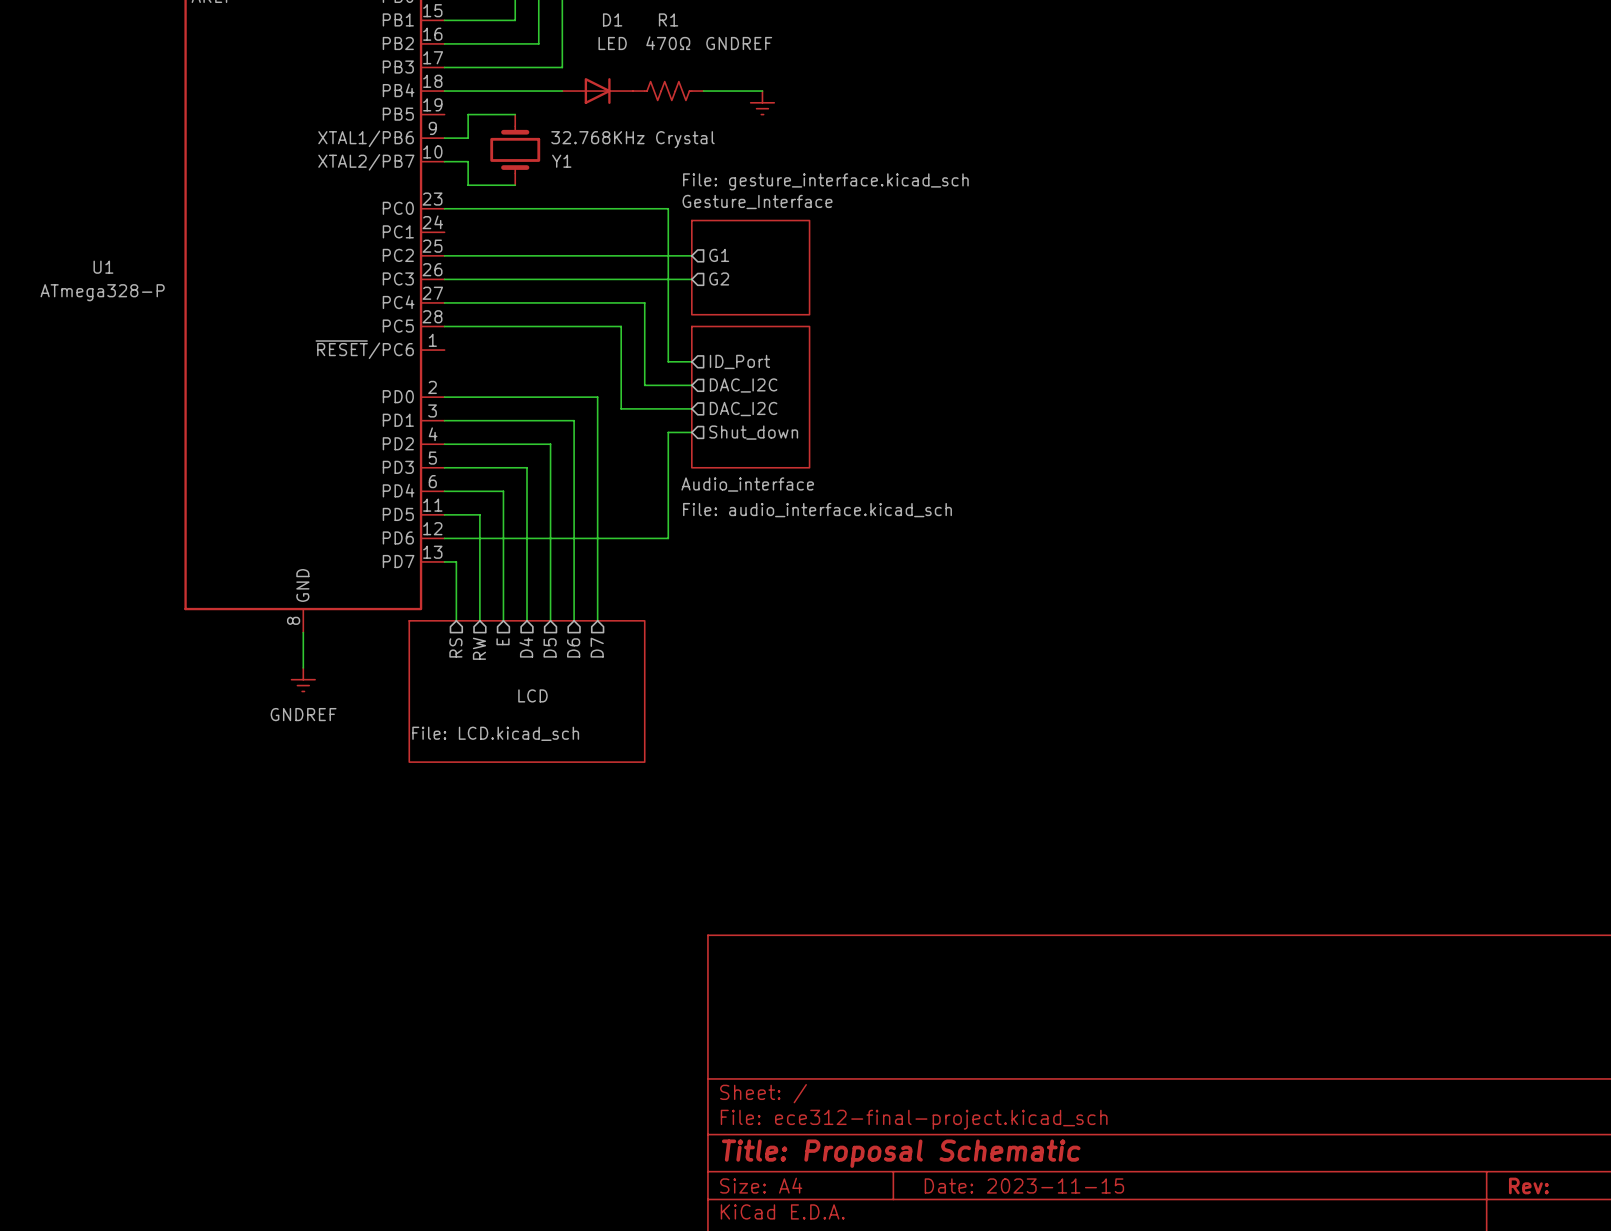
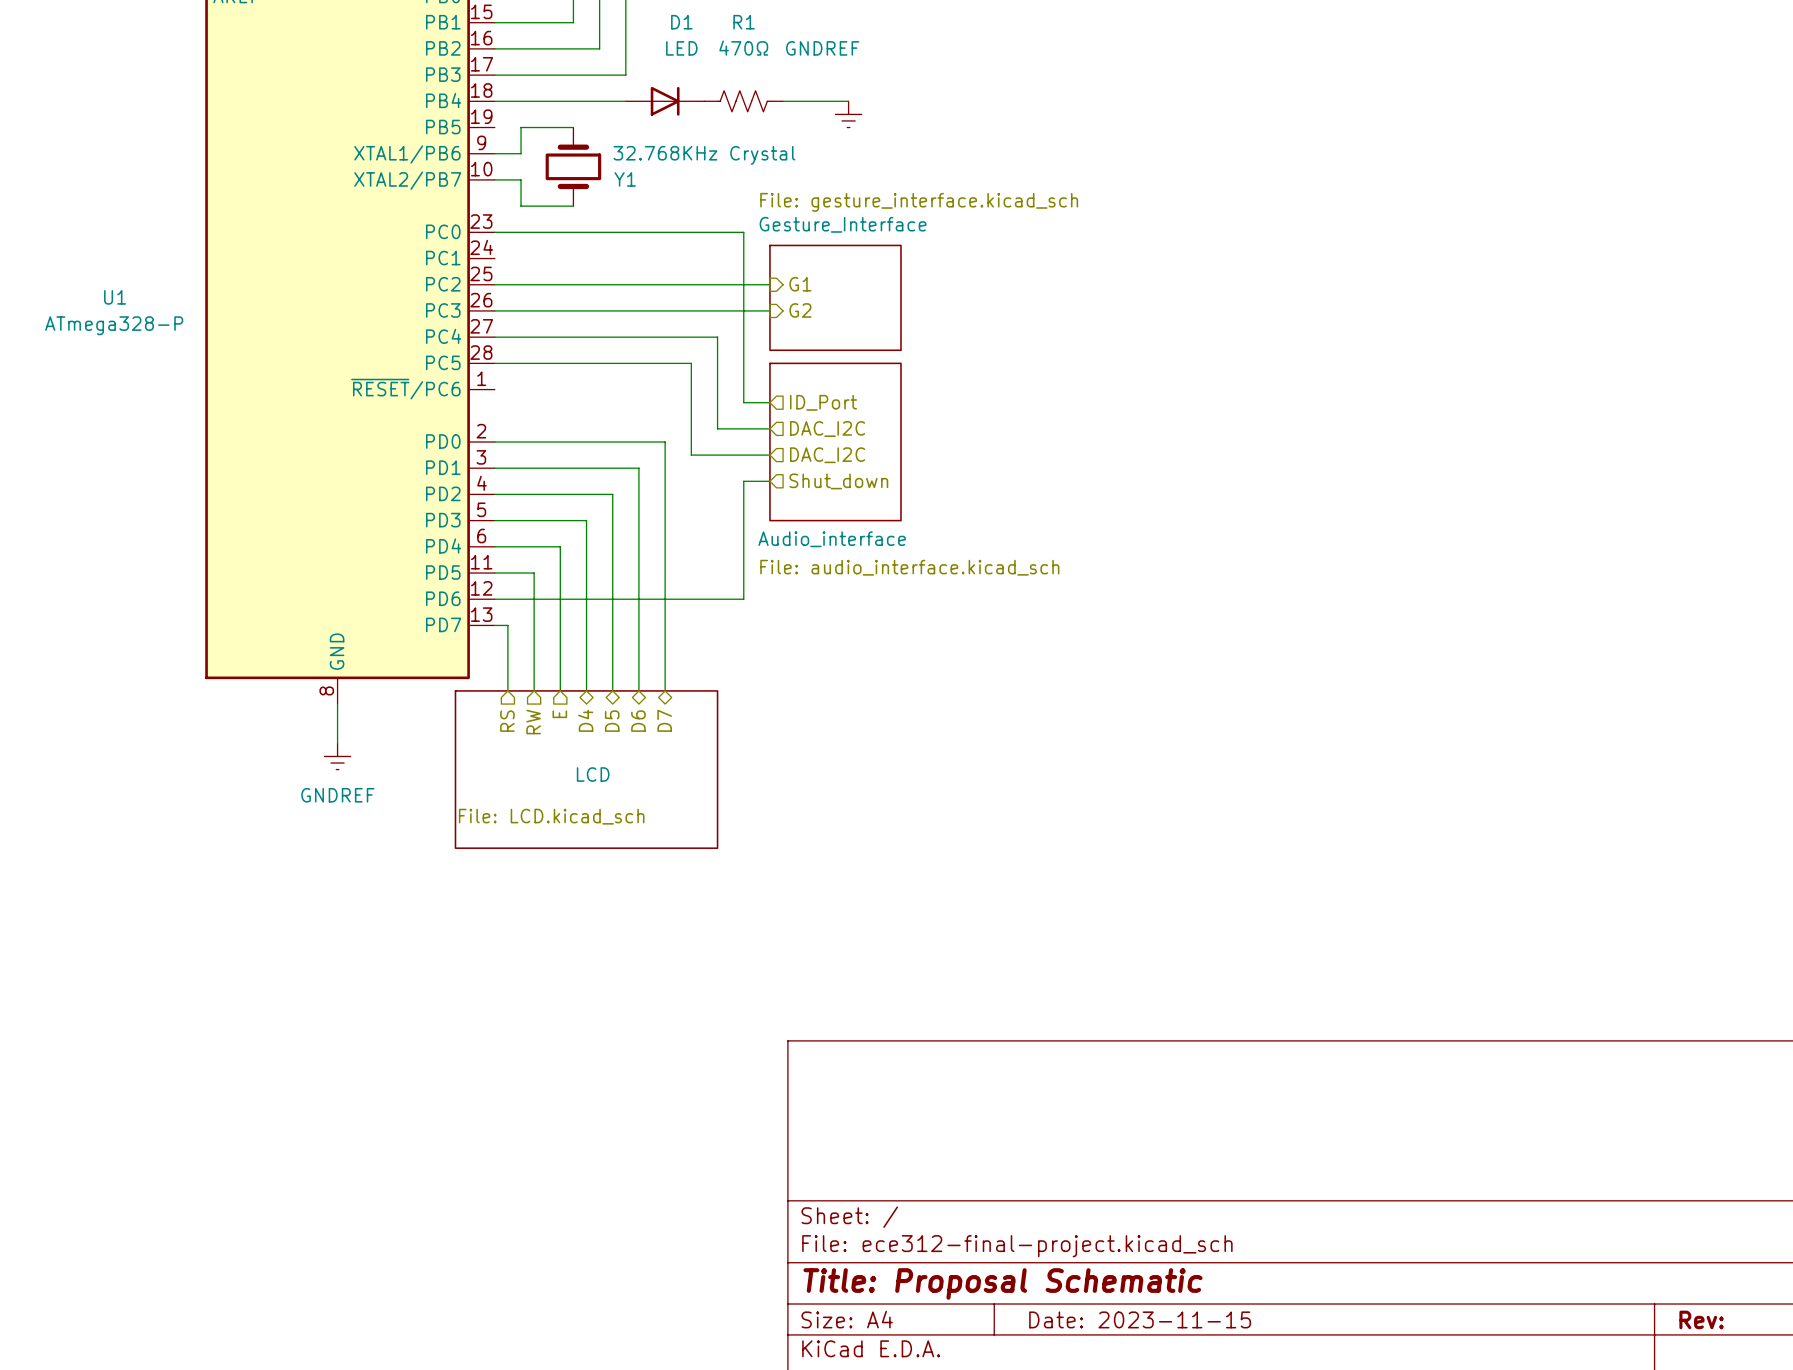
hierarchical label shape: input (719, 255) -> output (800, 284)
hierarchical label shape: input (719, 278) -> output (800, 310)
hierarchical label shape: input (526, 647) -> bidirectional (585, 720)
hierarchical label shape: input (550, 647) -> bidirectional (612, 721)
hierarchical label shape: input (573, 647) -> bidirectional (638, 721)
hierarchical label shape: input (597, 647) -> bidirectional (664, 720)

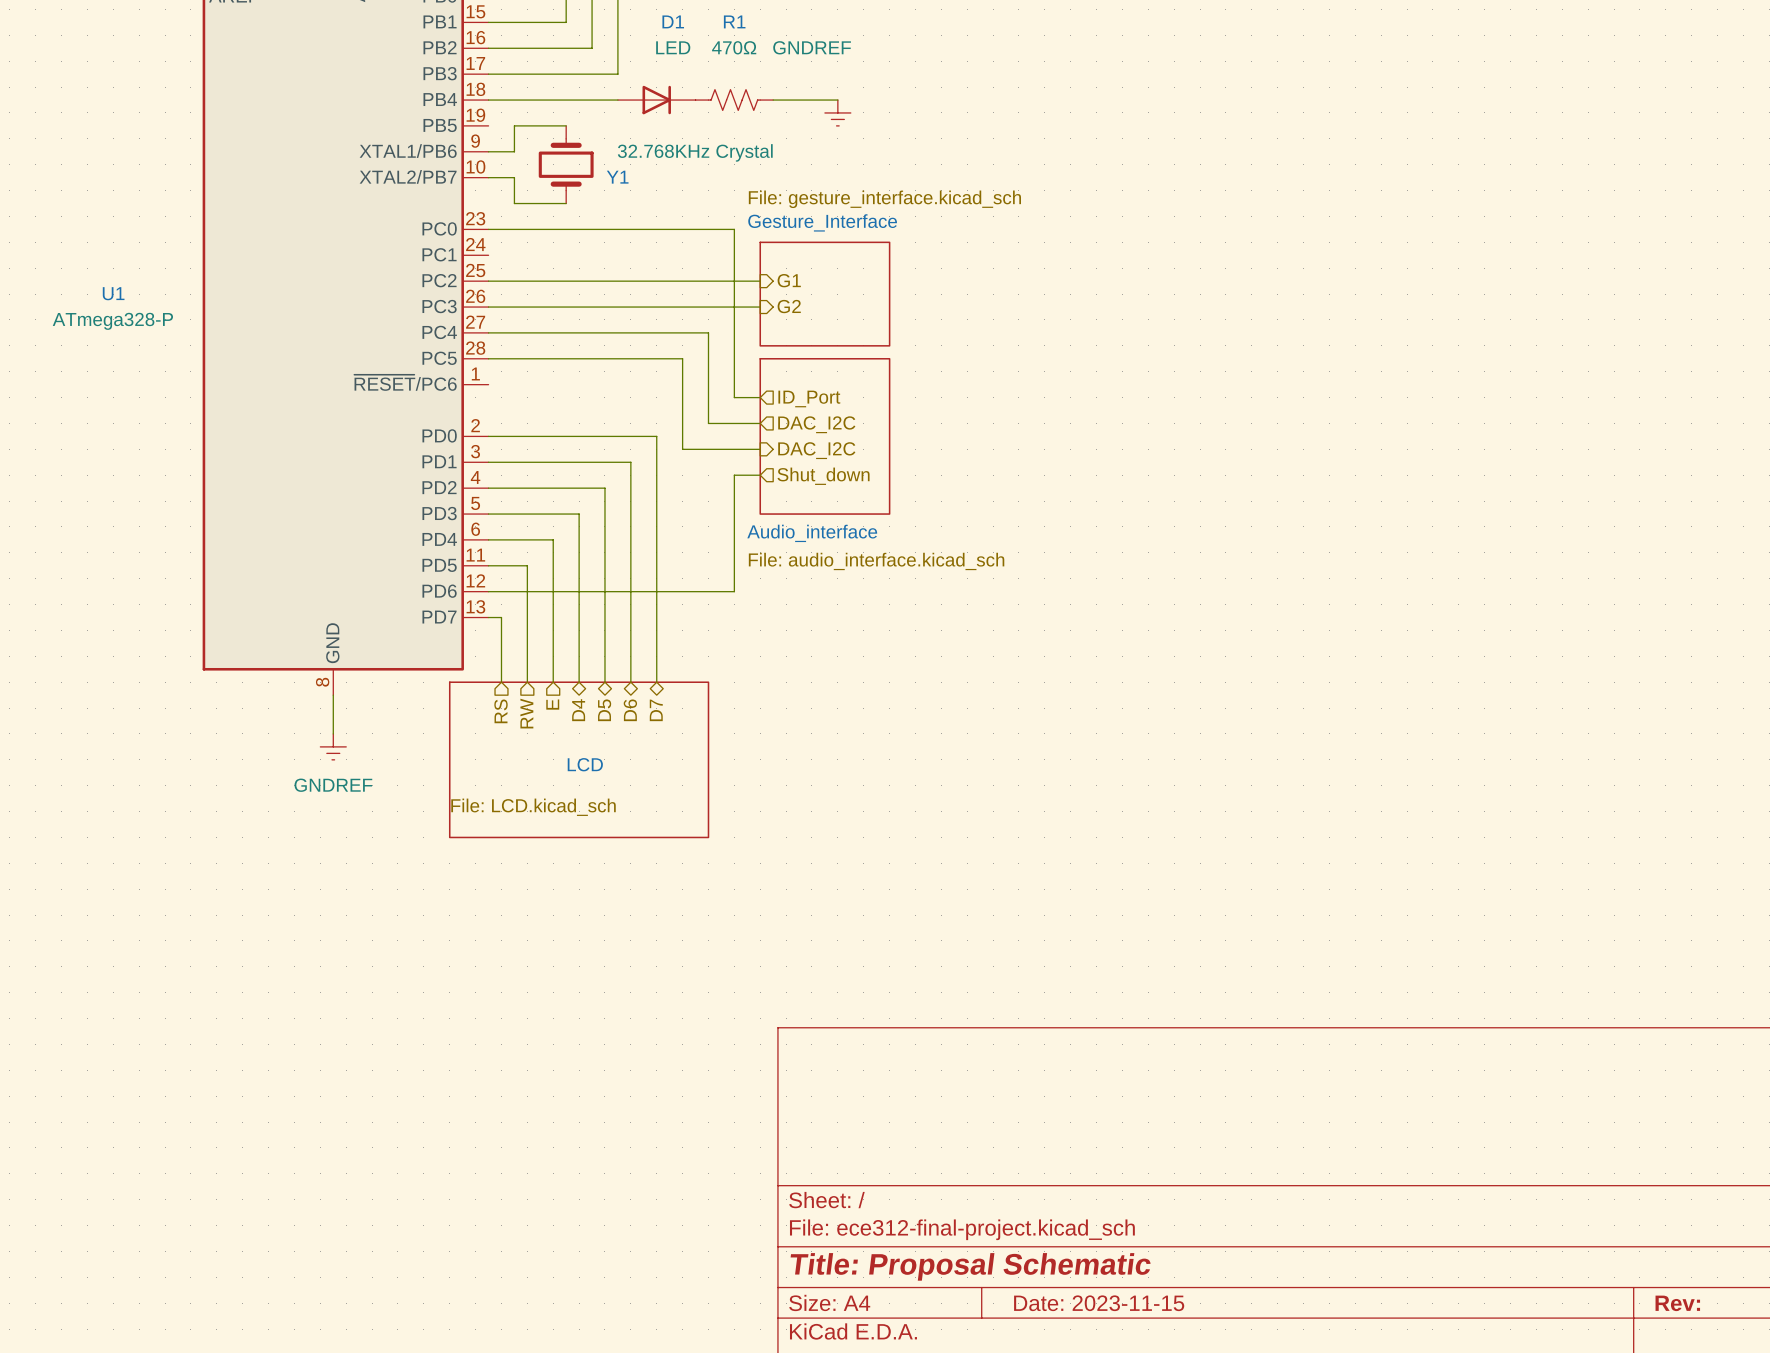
hierarchical label shape: input (827, 455) -> output (816, 450)

